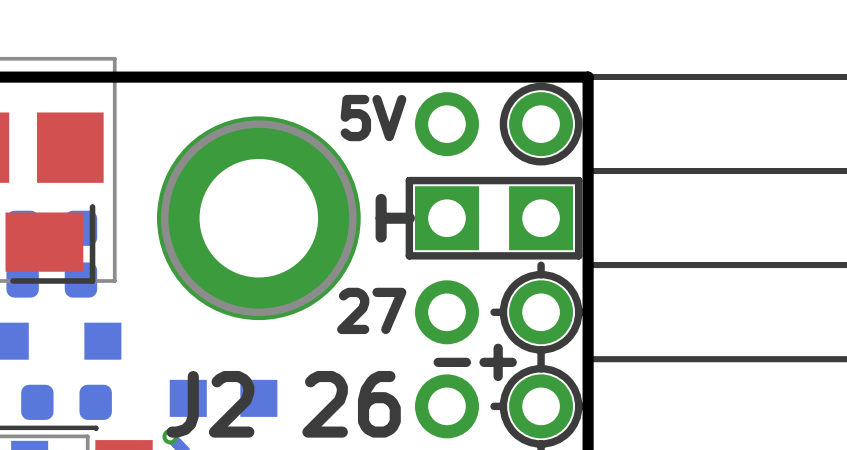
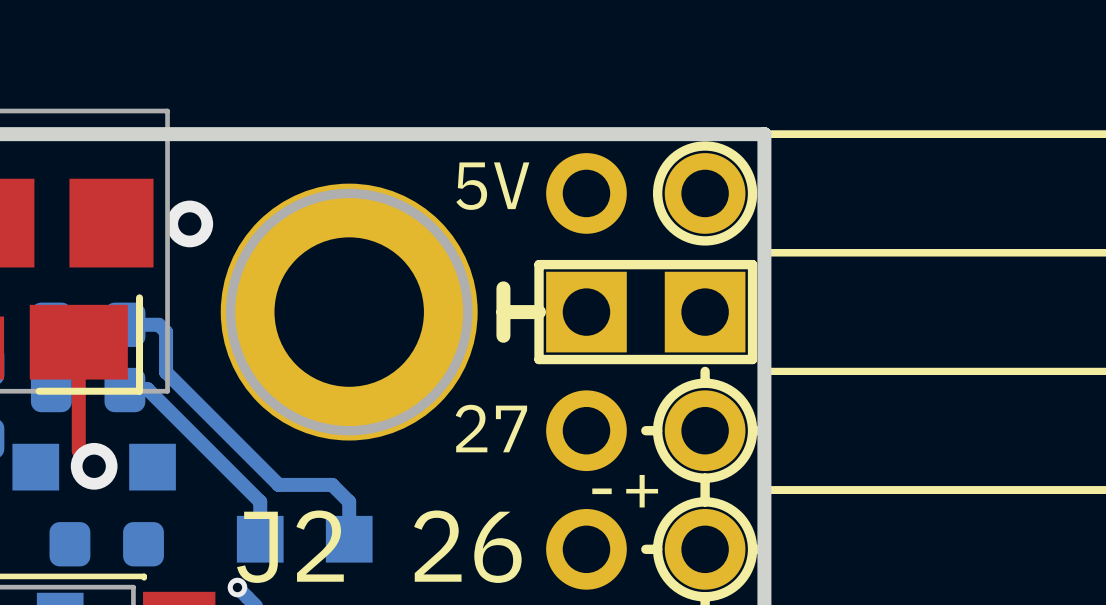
via: none -> (189, 223)
bottom track: none -> (129, 324) (158, 324) (166, 332) (166, 372) (278, 484) (332, 484) (349, 501) (349, 539)
top track: none -> (78, 342) (78, 450) (94, 466)
bottom track: none -> (129, 390) (147, 389) (260, 501) (260, 539)
via: none -> (94, 466)

